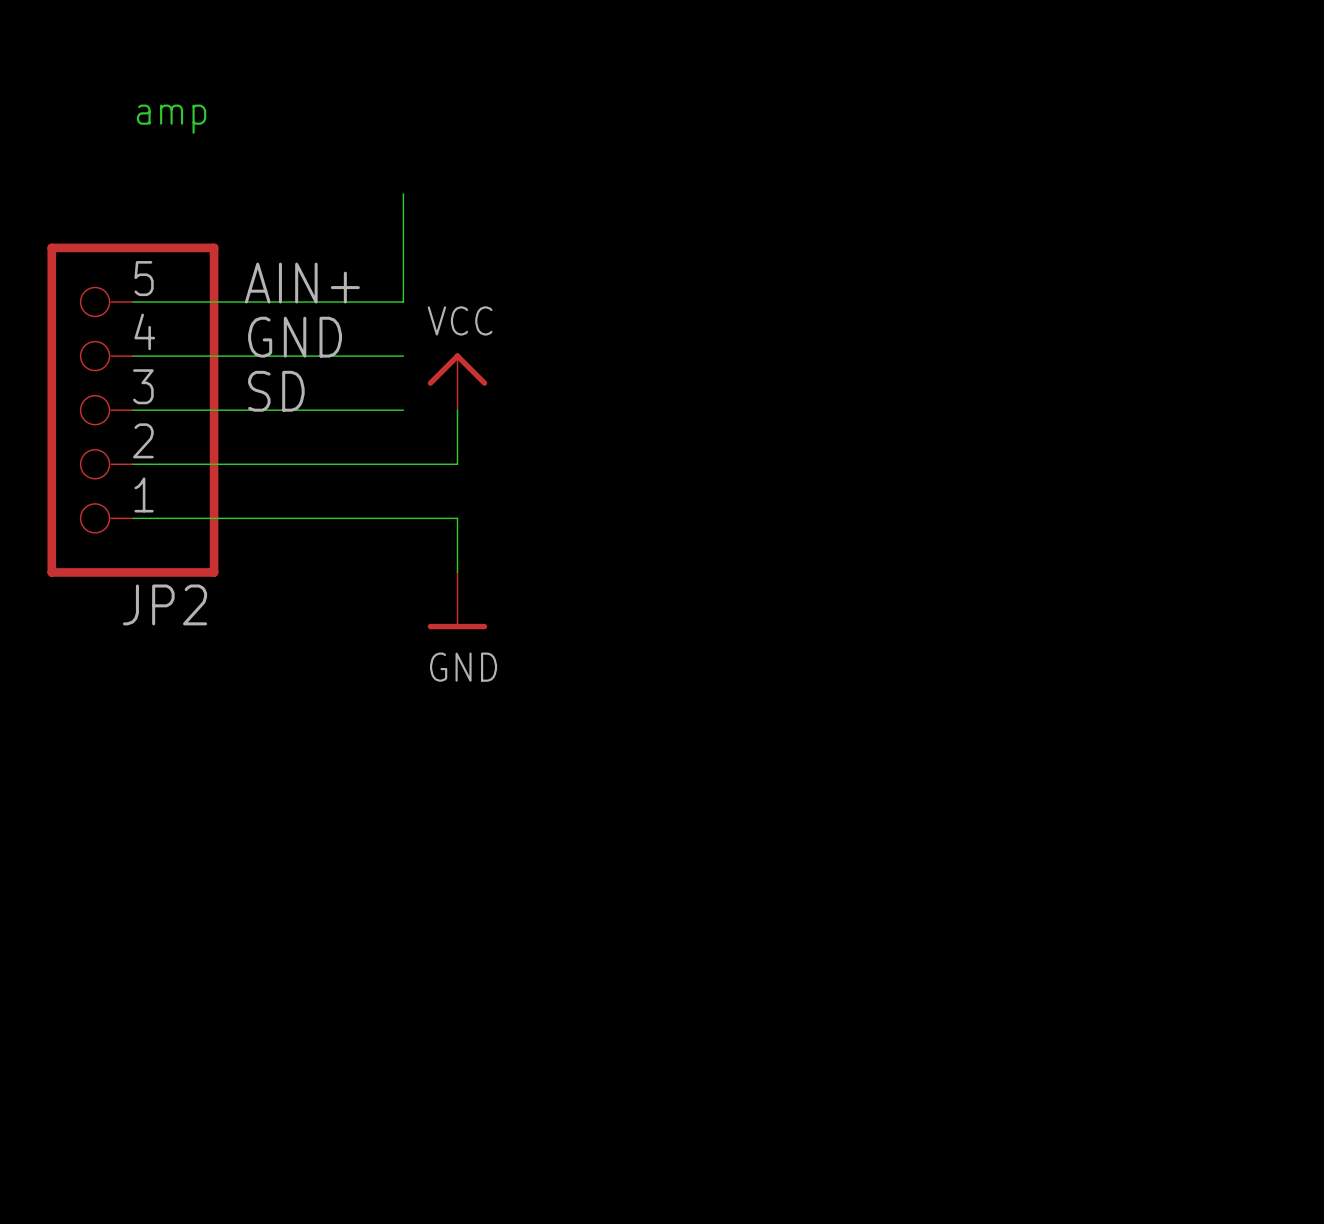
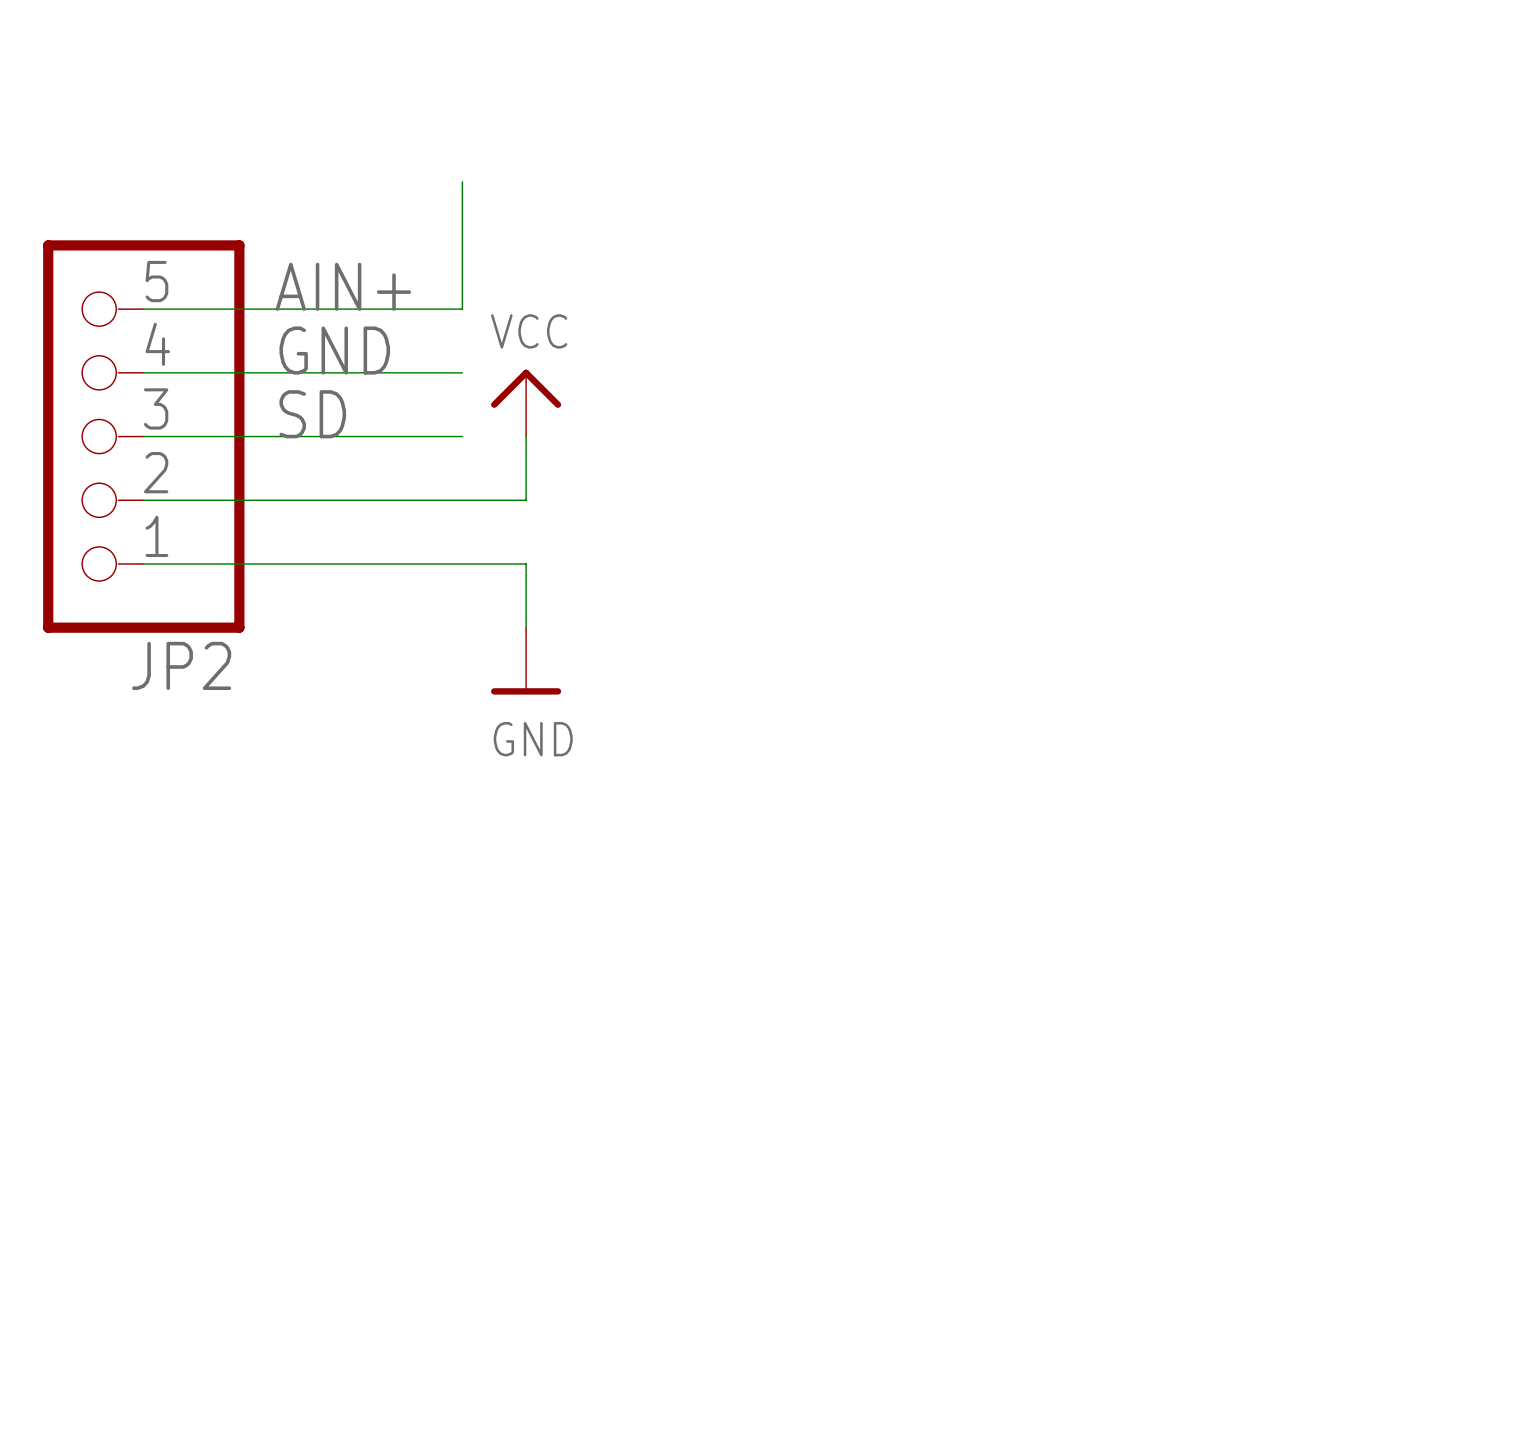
text: amp (171, 119) -> none

